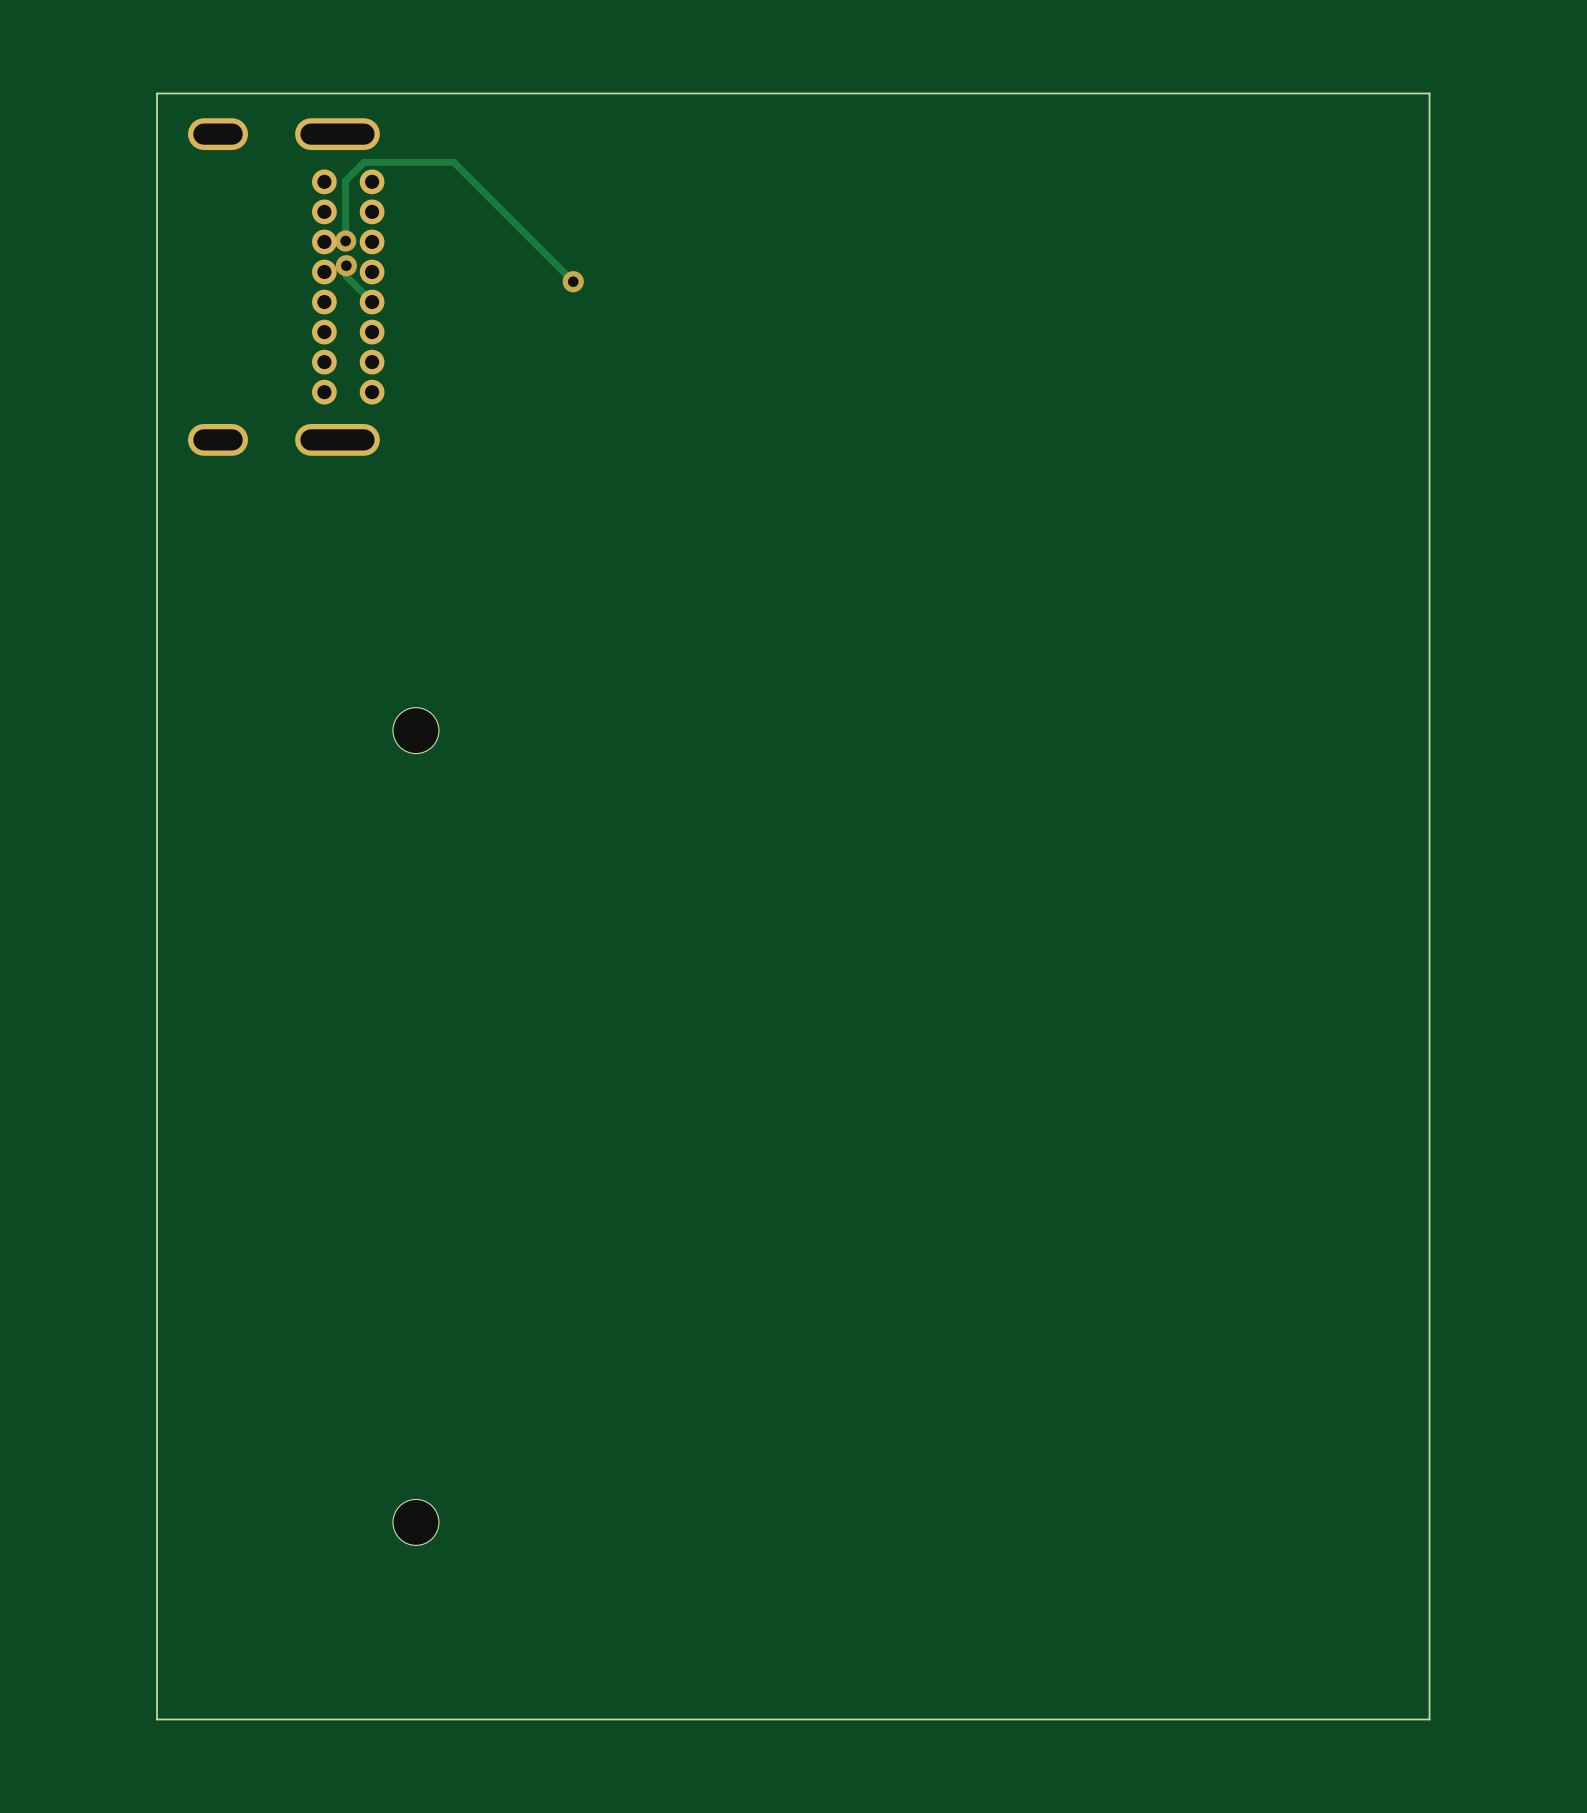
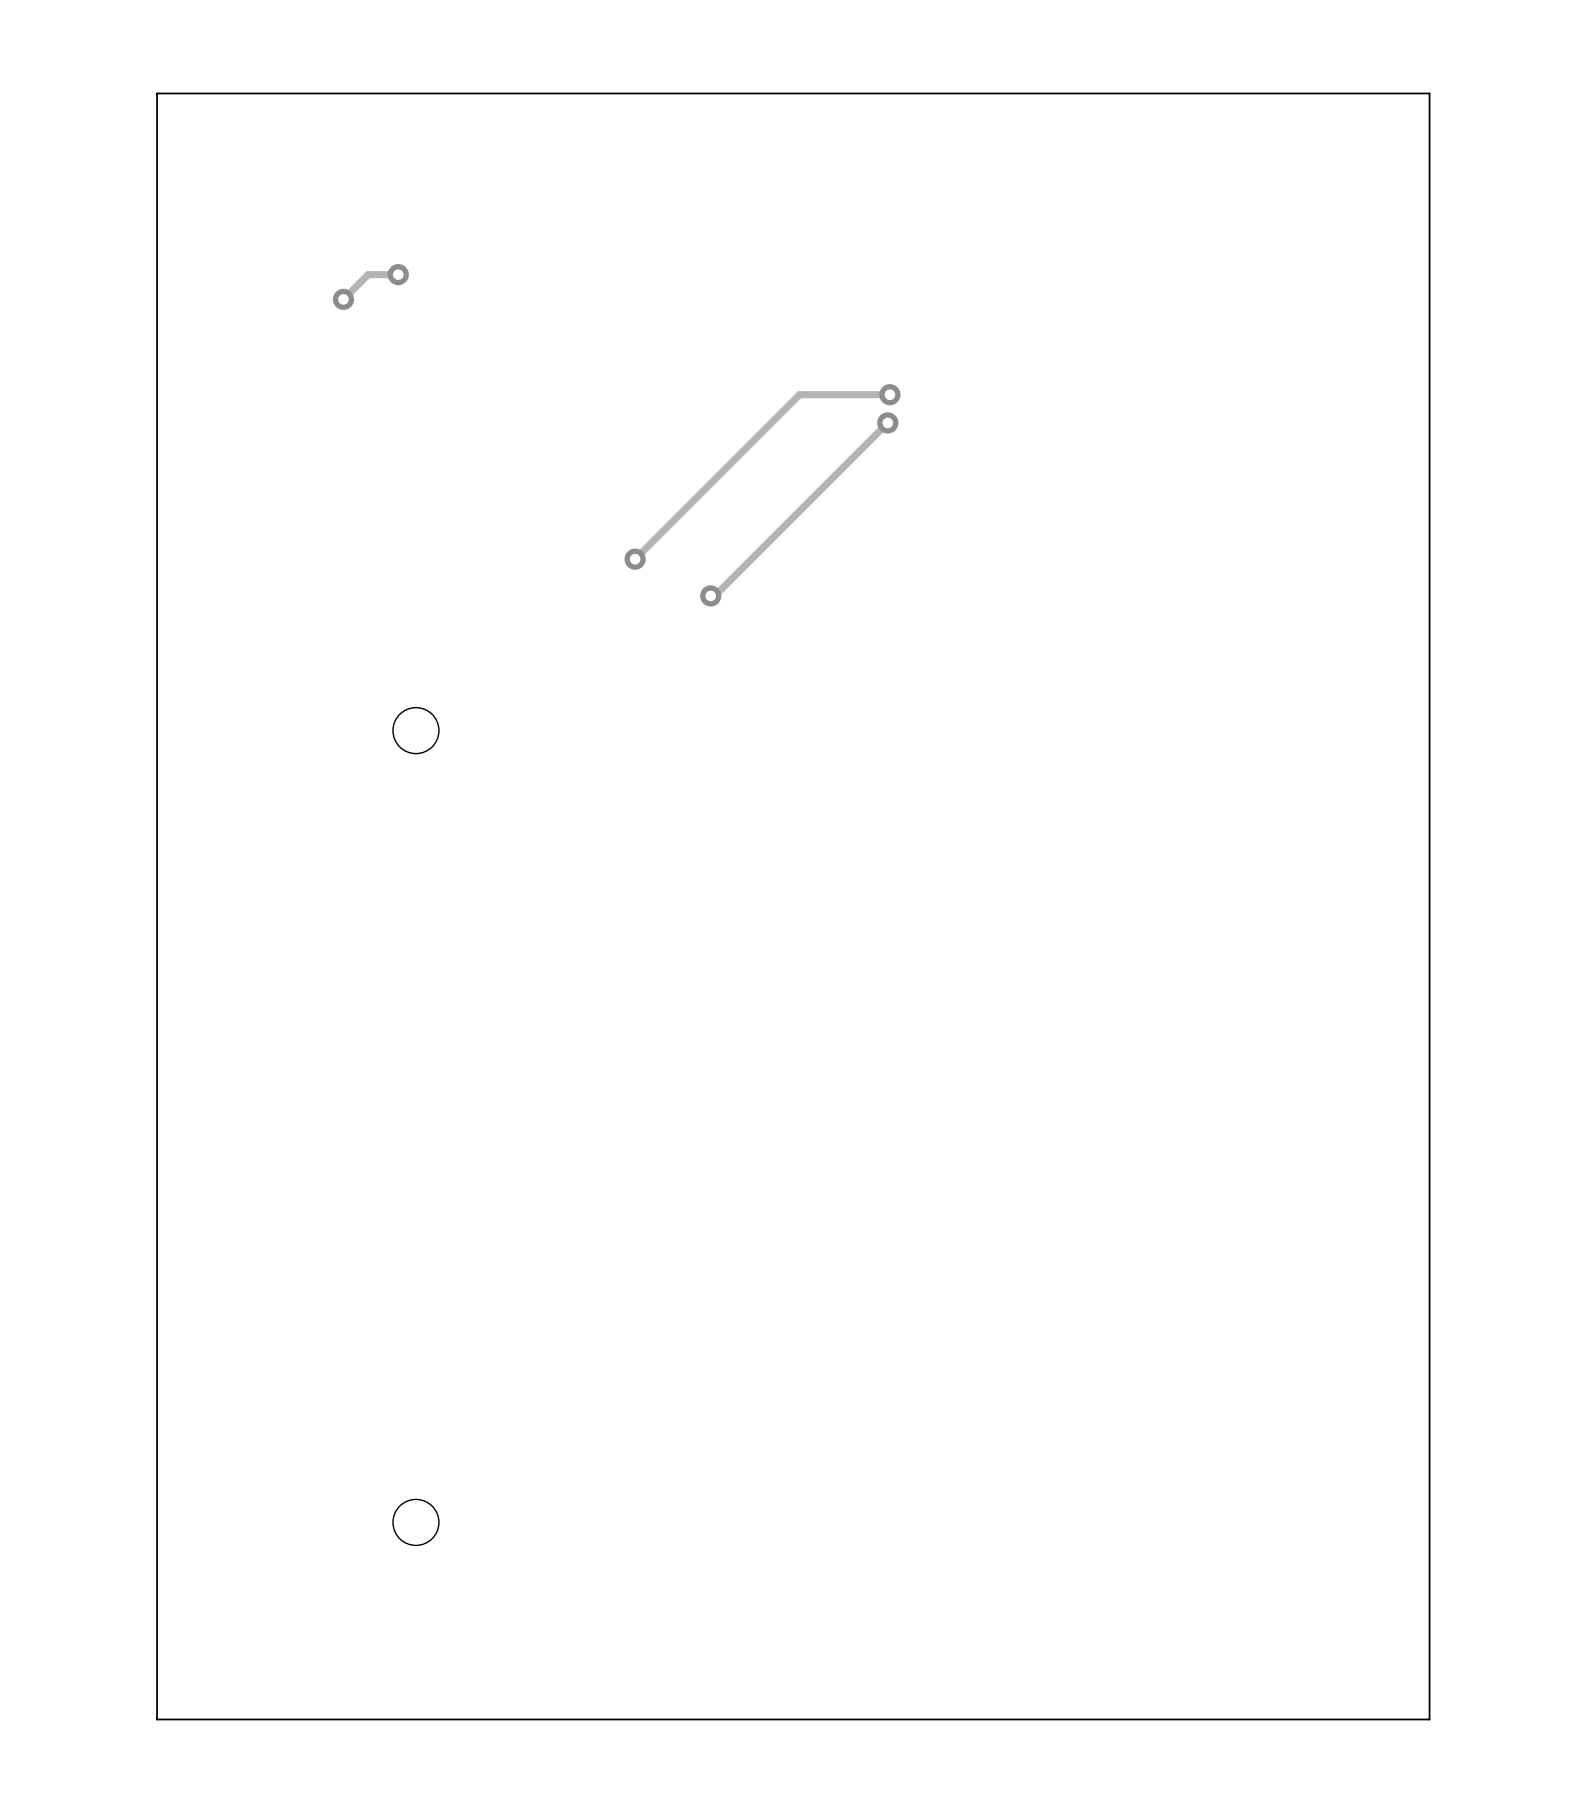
track: (345, 241) (345, 180) (364, 162) (453, 162) (573, 281) -> none
via: (345, 241) -> none
track: (346, 265) (346, 276) (372, 302) -> none
via: (346, 265) -> none
track: none -> (398, 274) (368, 274) (343, 299)
via: none -> (398, 274)
via: (573, 281) -> none
part: (286, 287) -> none
via: none -> (343, 299)
track: none -> (889, 394) (799, 394) (635, 559)
via: none -> (889, 394)
track: none -> (887, 422) (714, 595) (710, 595)
via: none -> (887, 422)
via: none -> (635, 559)
via: none -> (710, 595)

